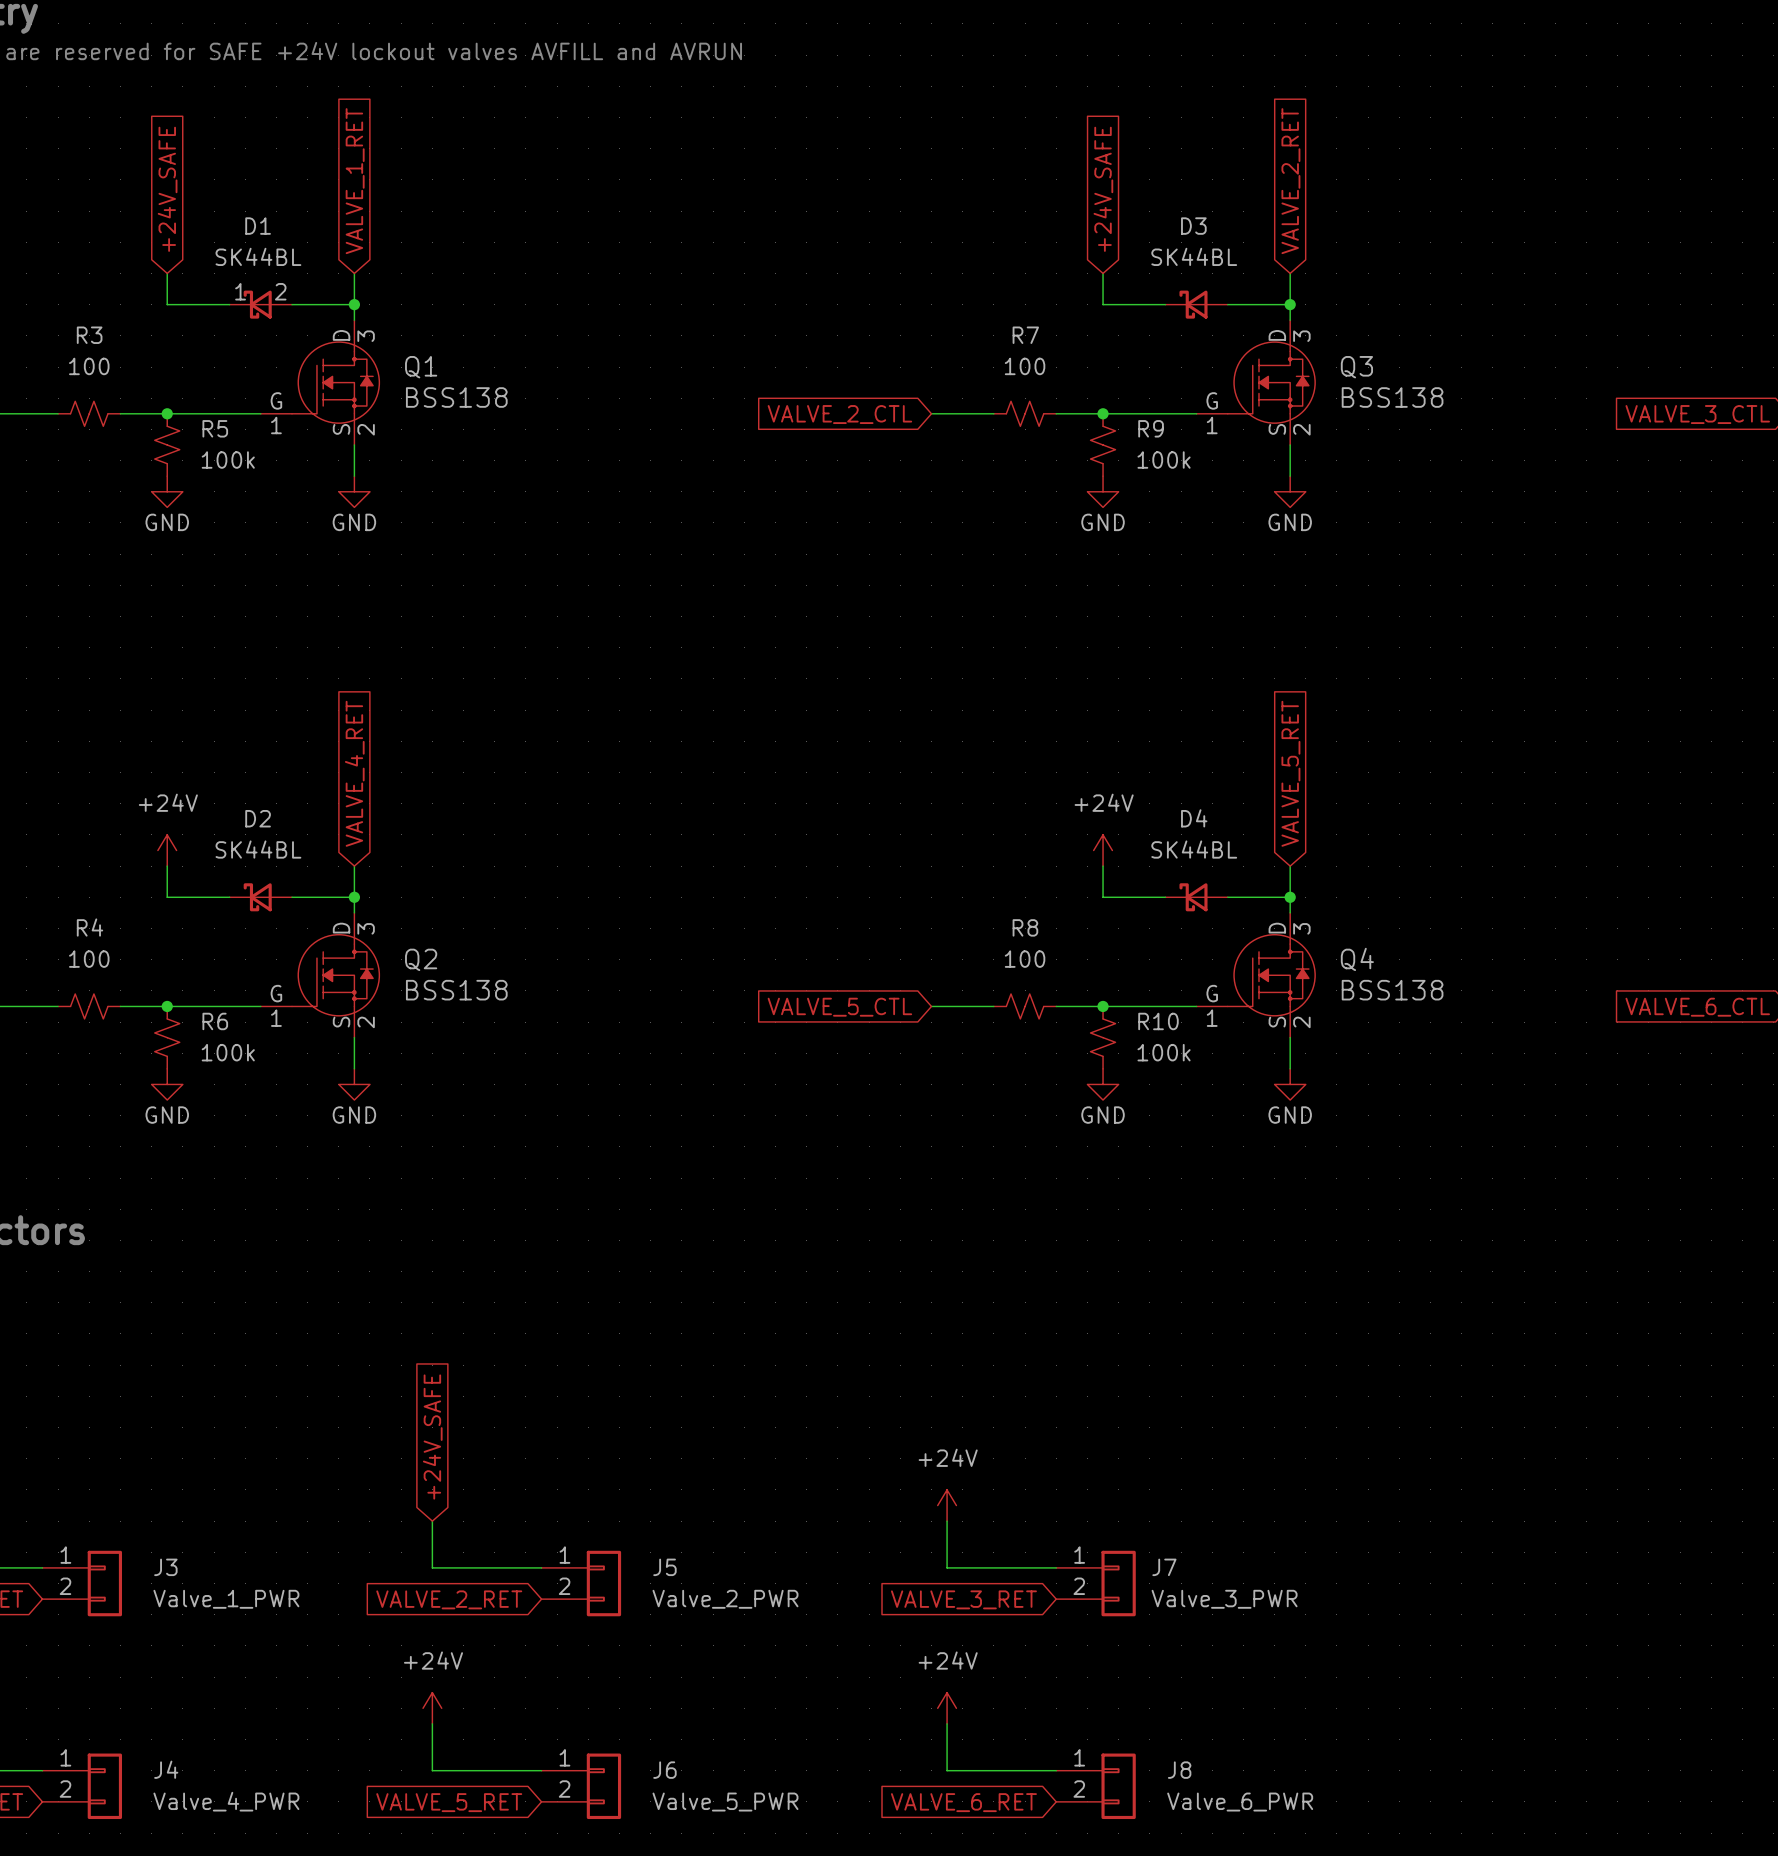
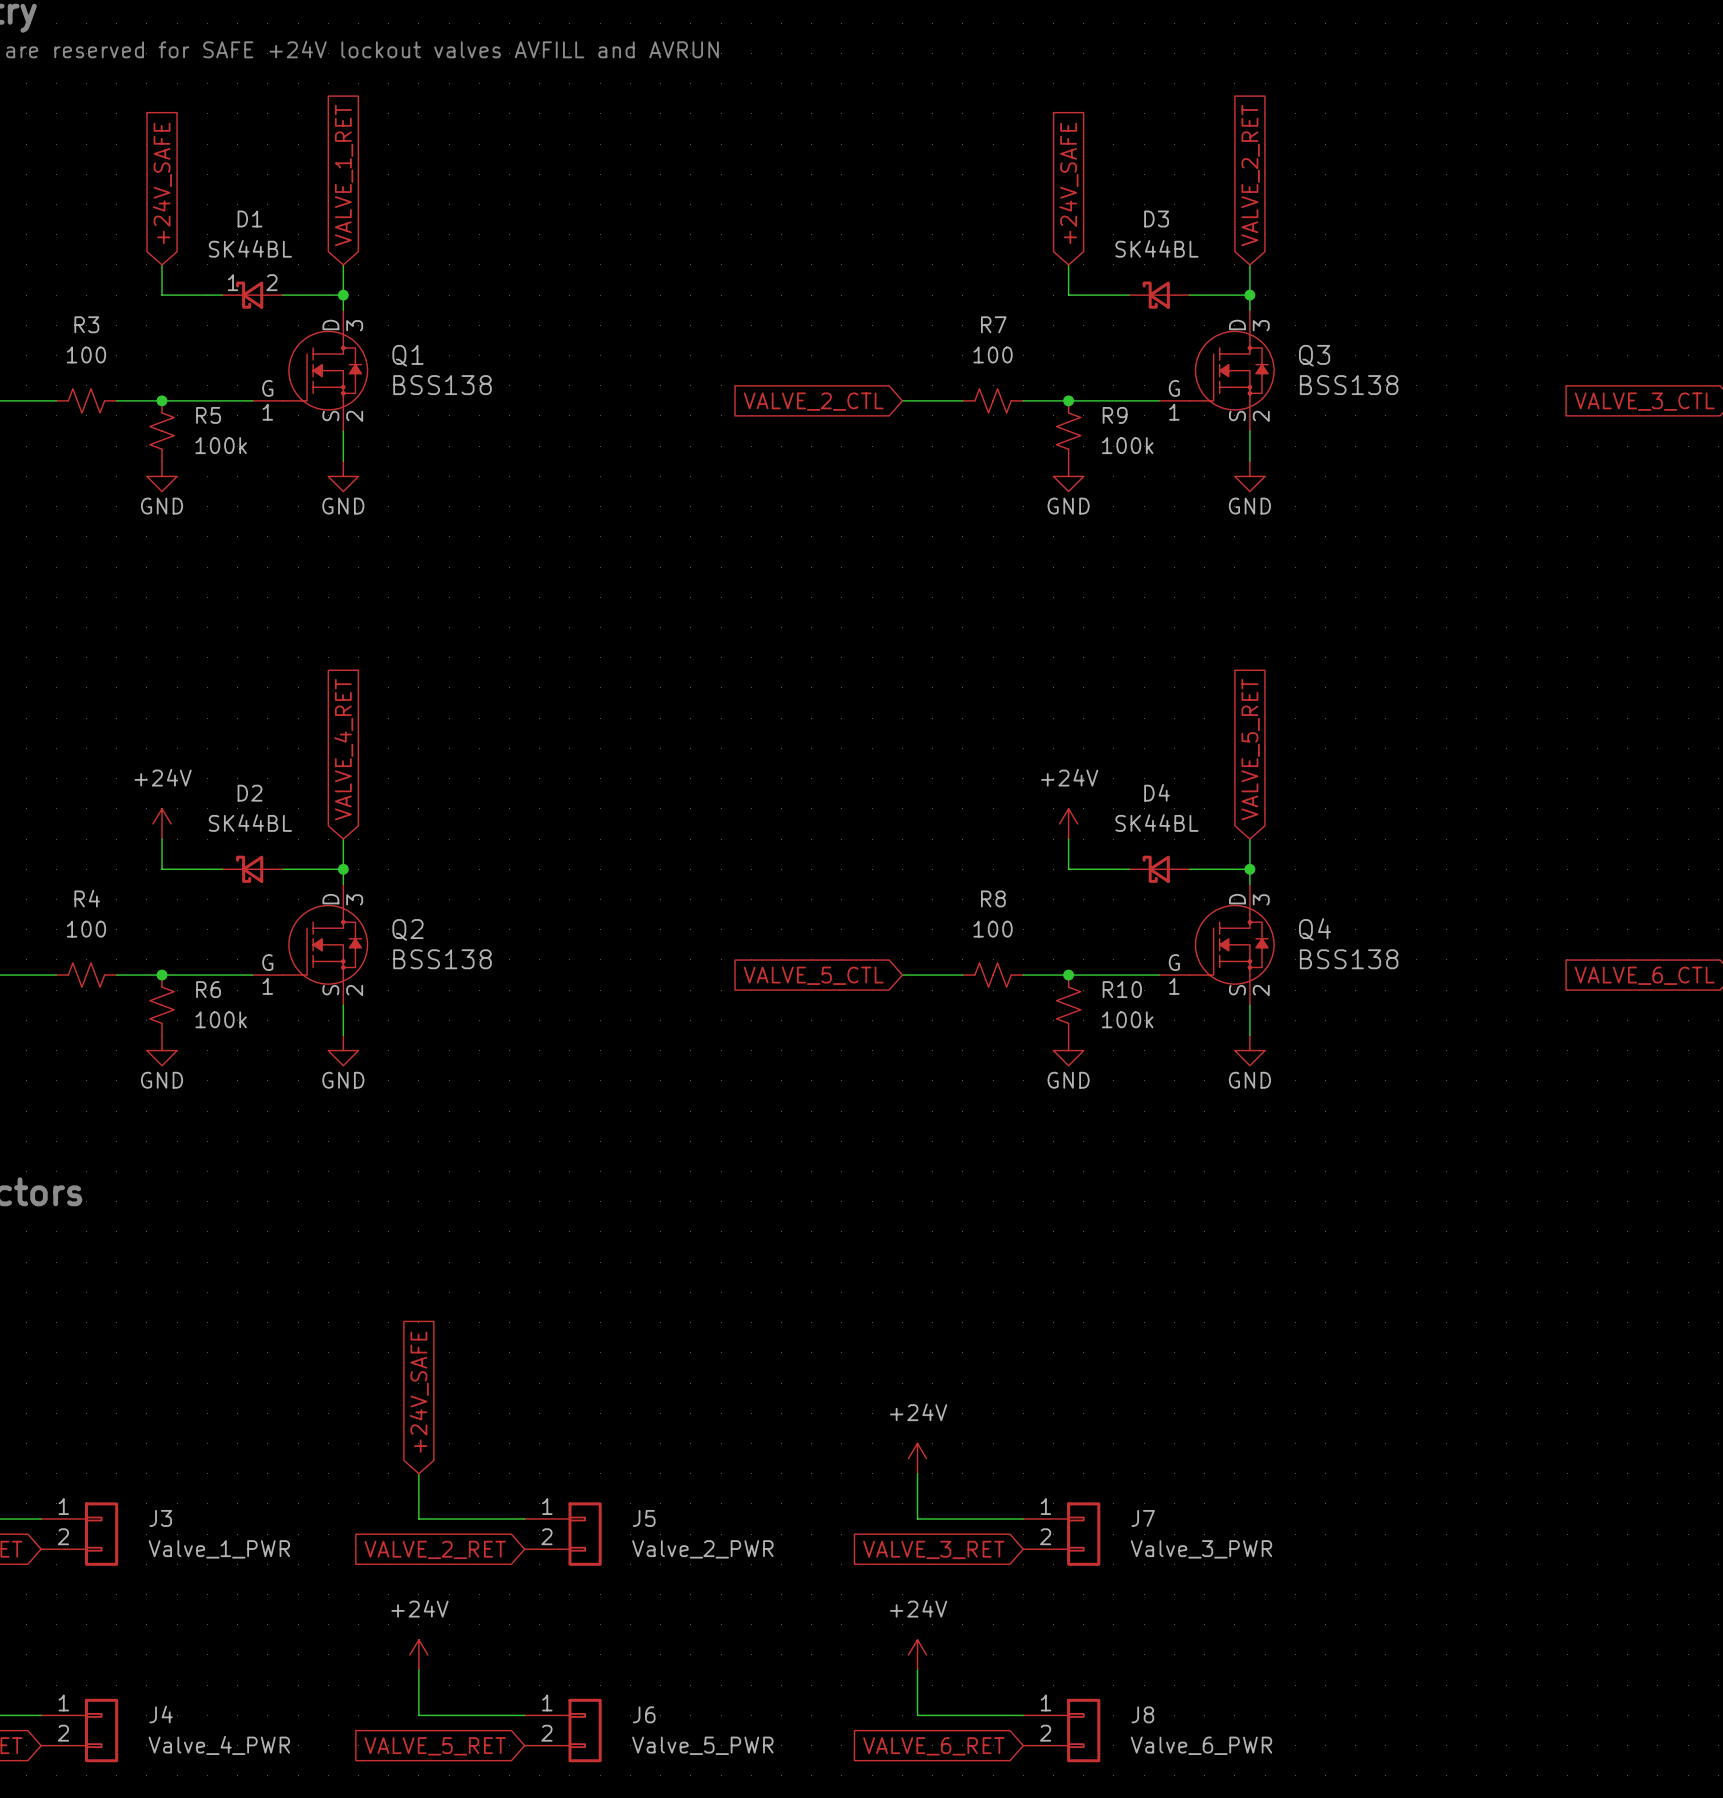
J7 name position: J7 (1164, 1567) -> J7 (1143, 1518)
J7 value position: Valve_3_PWR (1224, 1599) -> Valve_3_PWR (1201, 1549)

